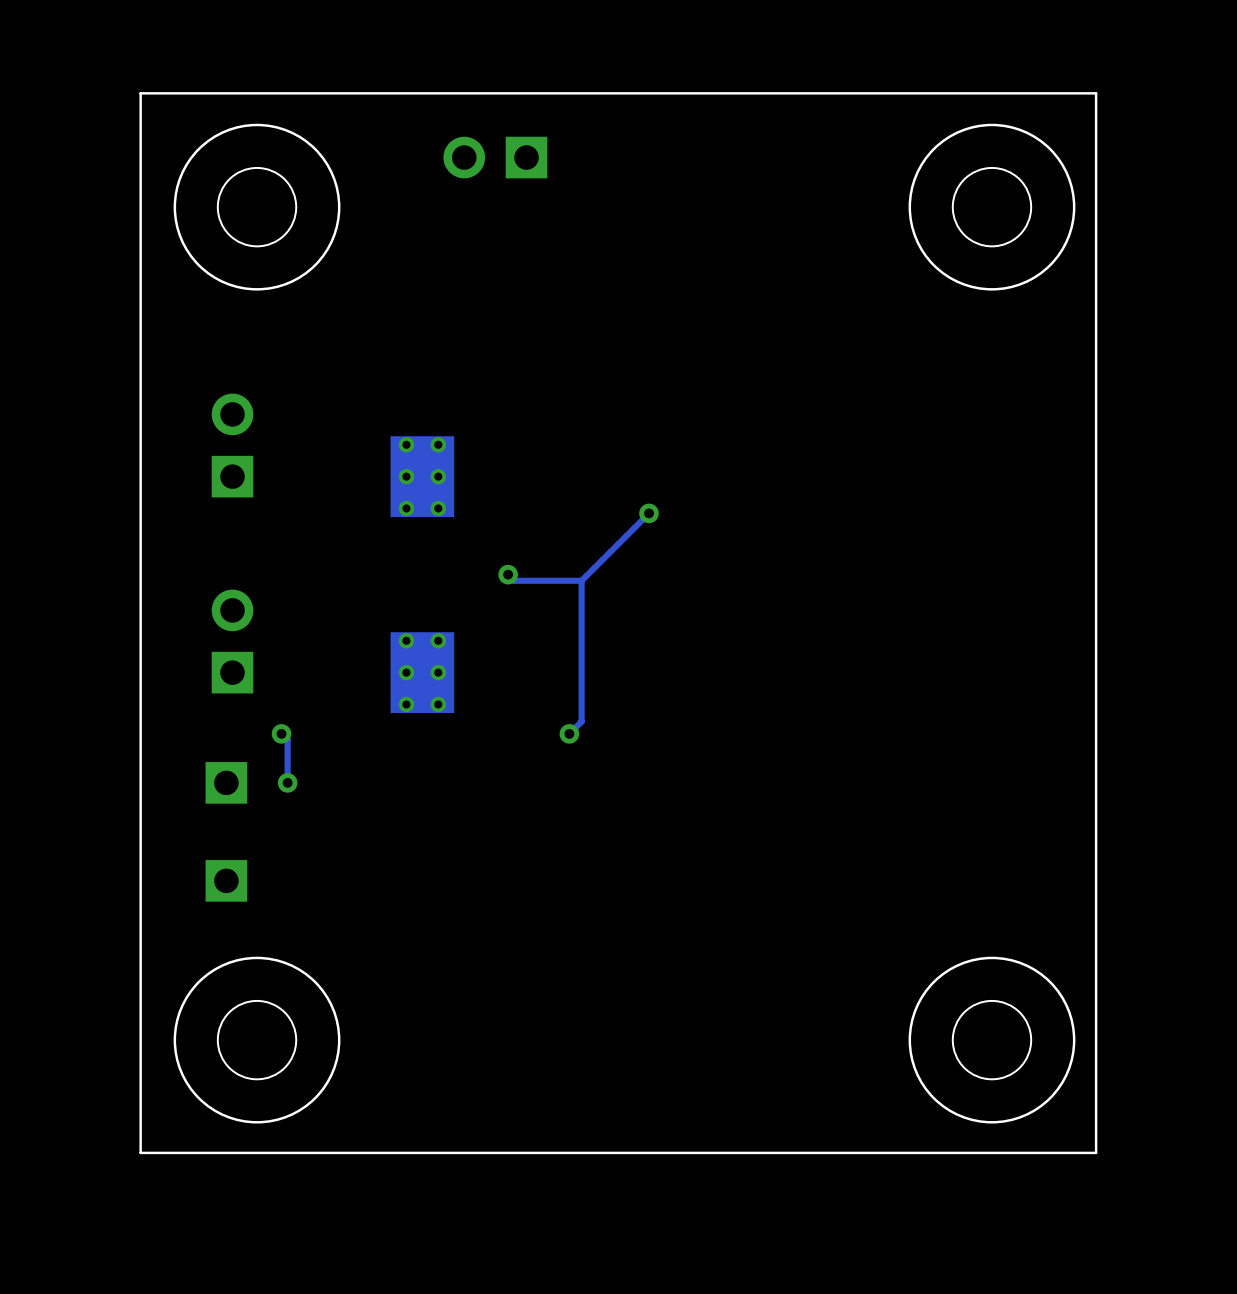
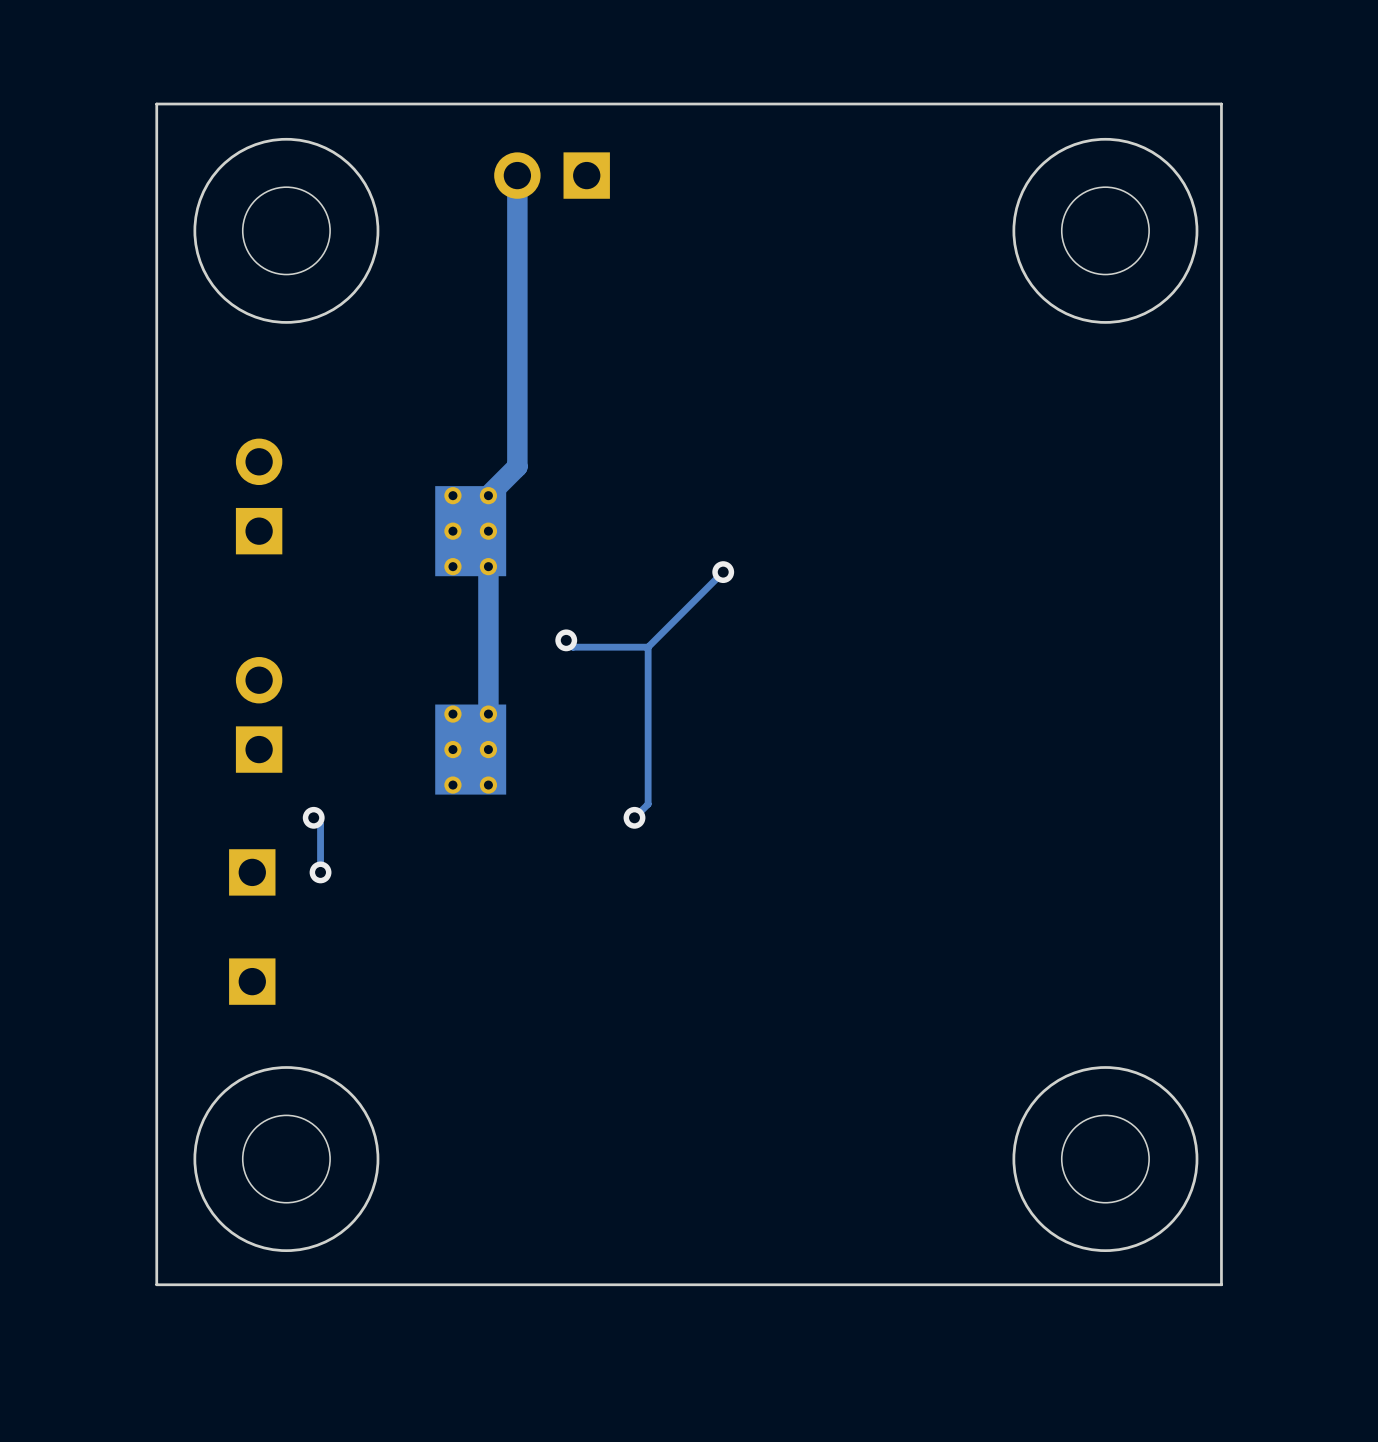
track: none -> (517, 175) (517, 466) (488, 495)
track: none -> (488, 566) (488, 714)

